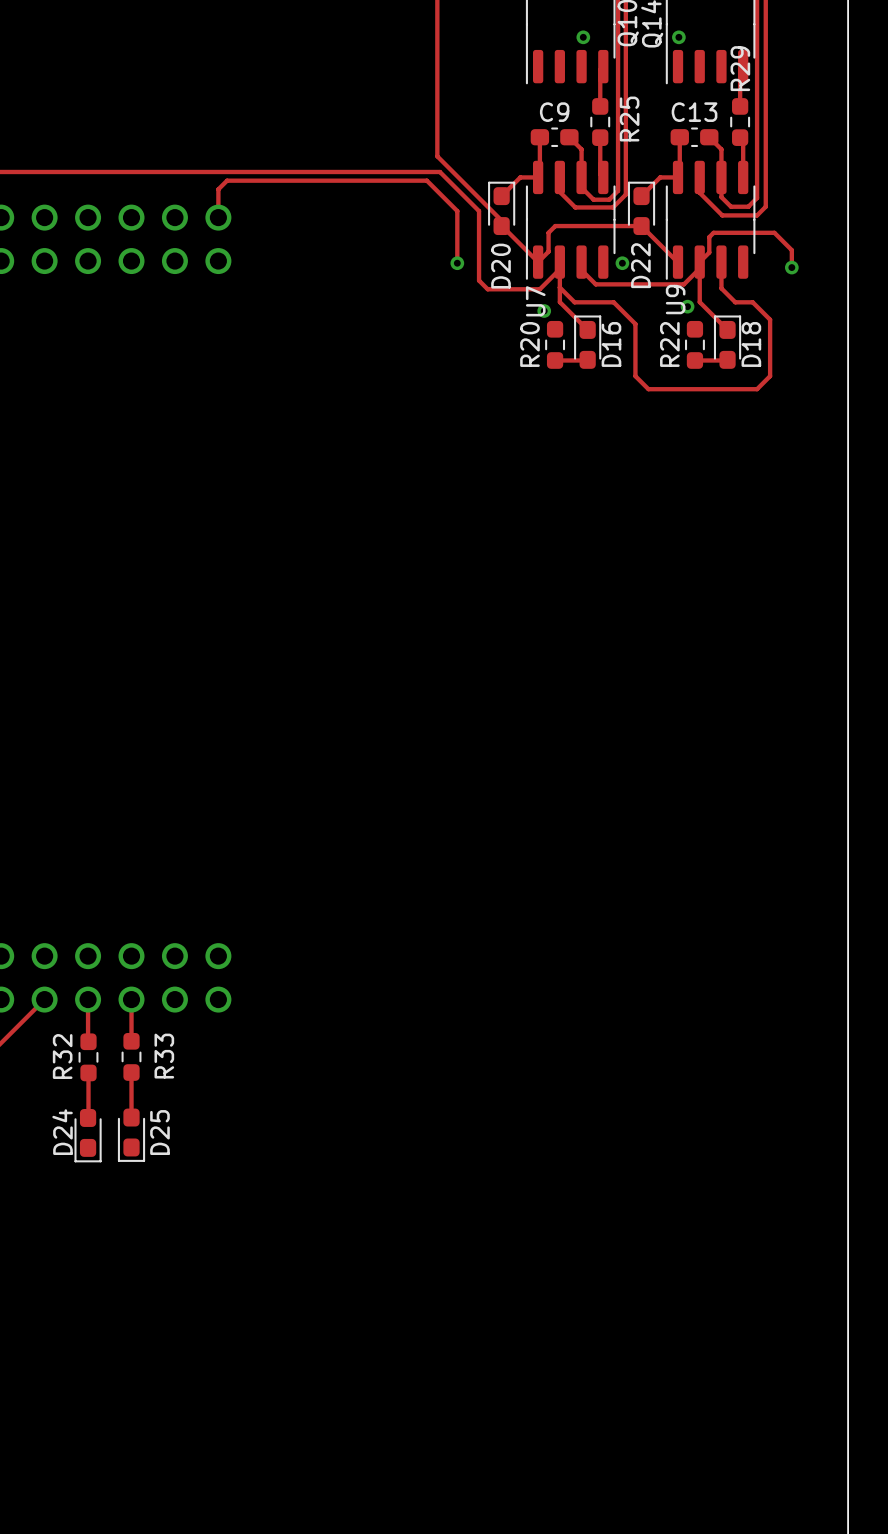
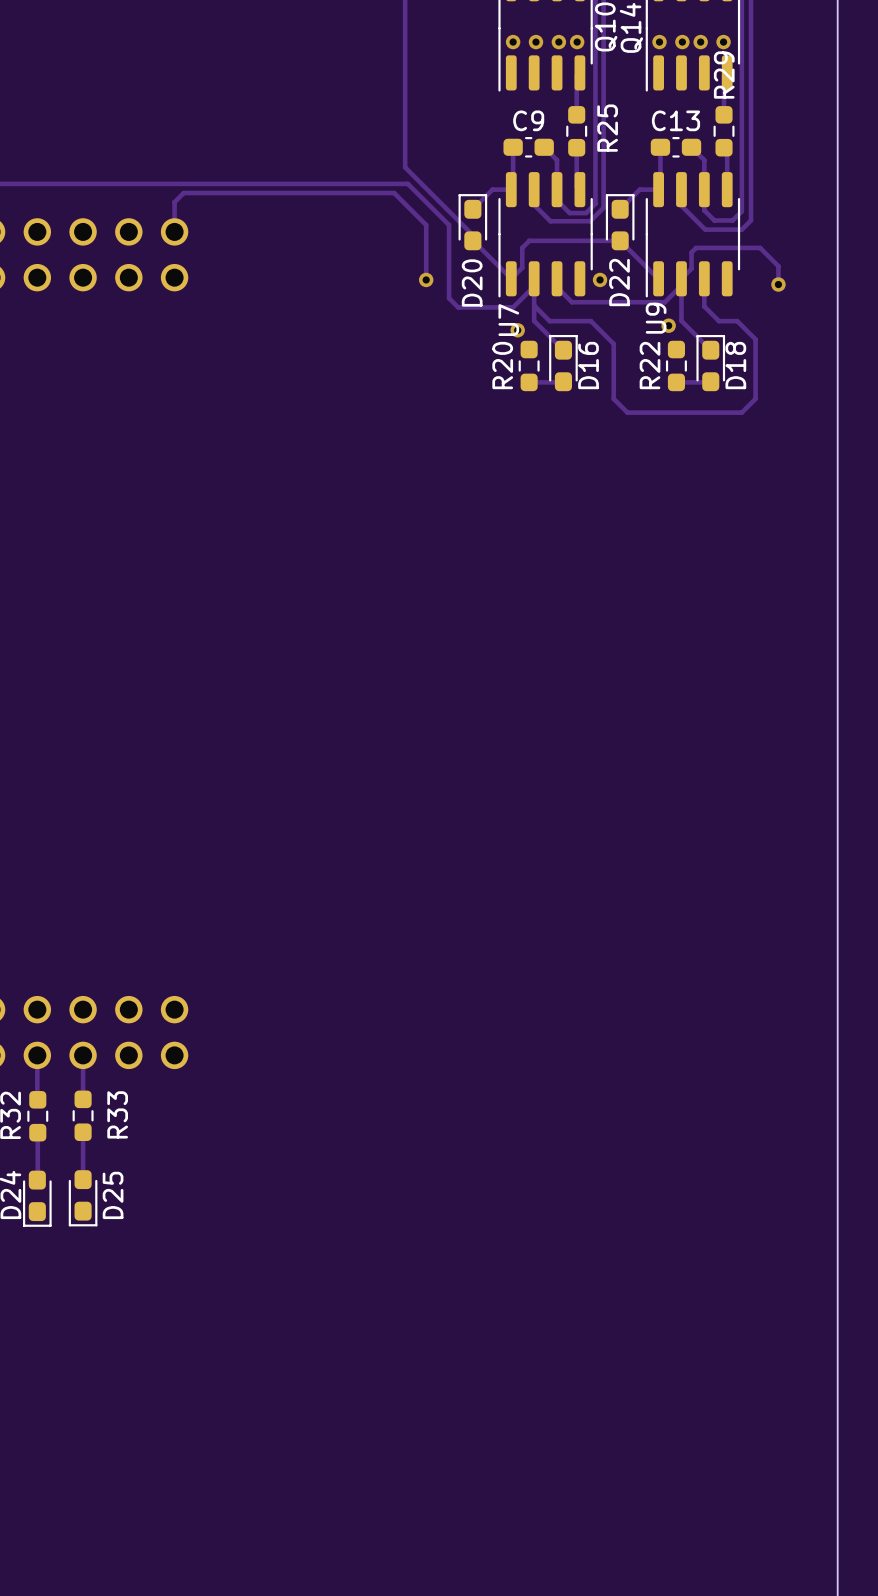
via: none -> (513, 42)
via: none -> (535, 42)
via: none -> (577, 42)
via: none -> (682, 42)
via: none -> (700, 42)
via: none -> (723, 42)

